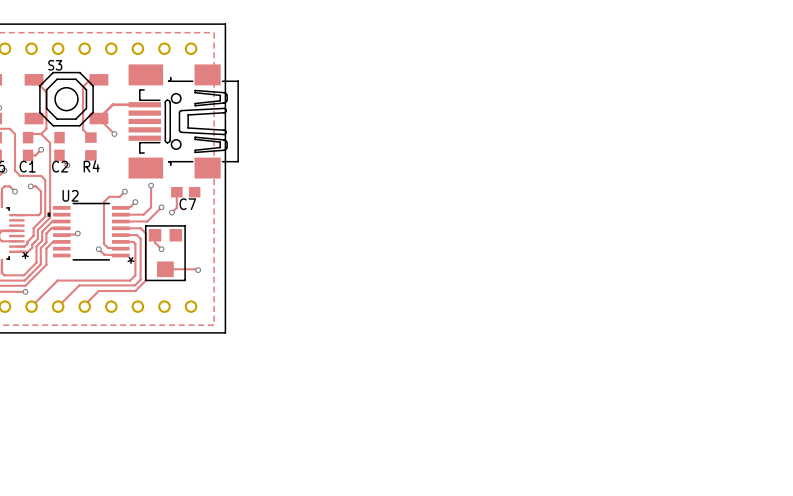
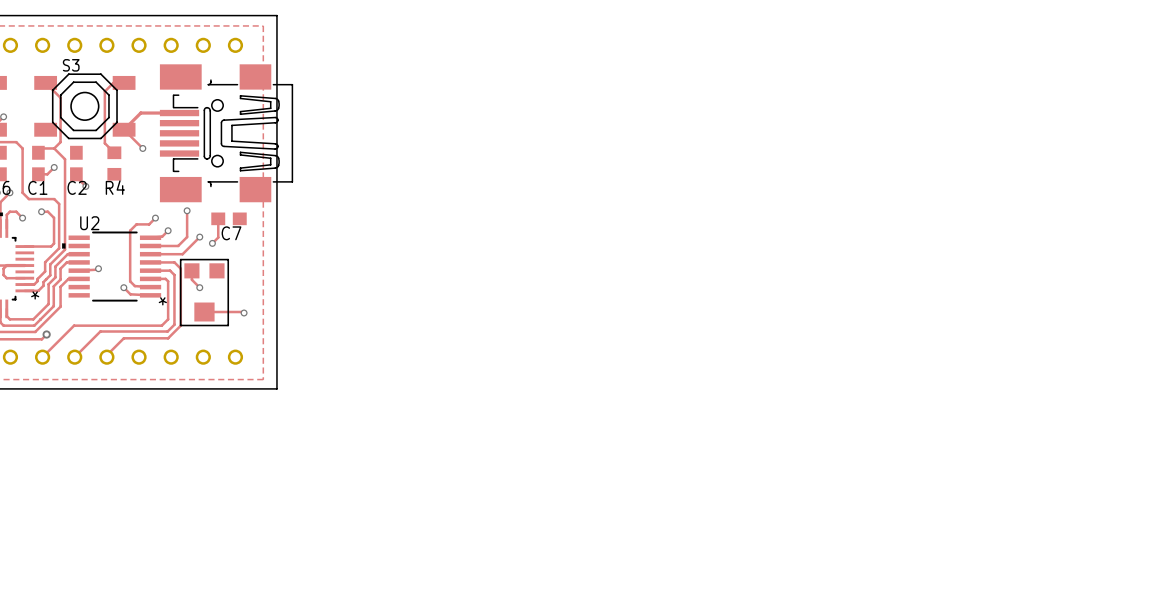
track: none -> (46, 334) (41, 339) (35, 339)
via: none -> (46, 334)
via: (25, 291) -> none

